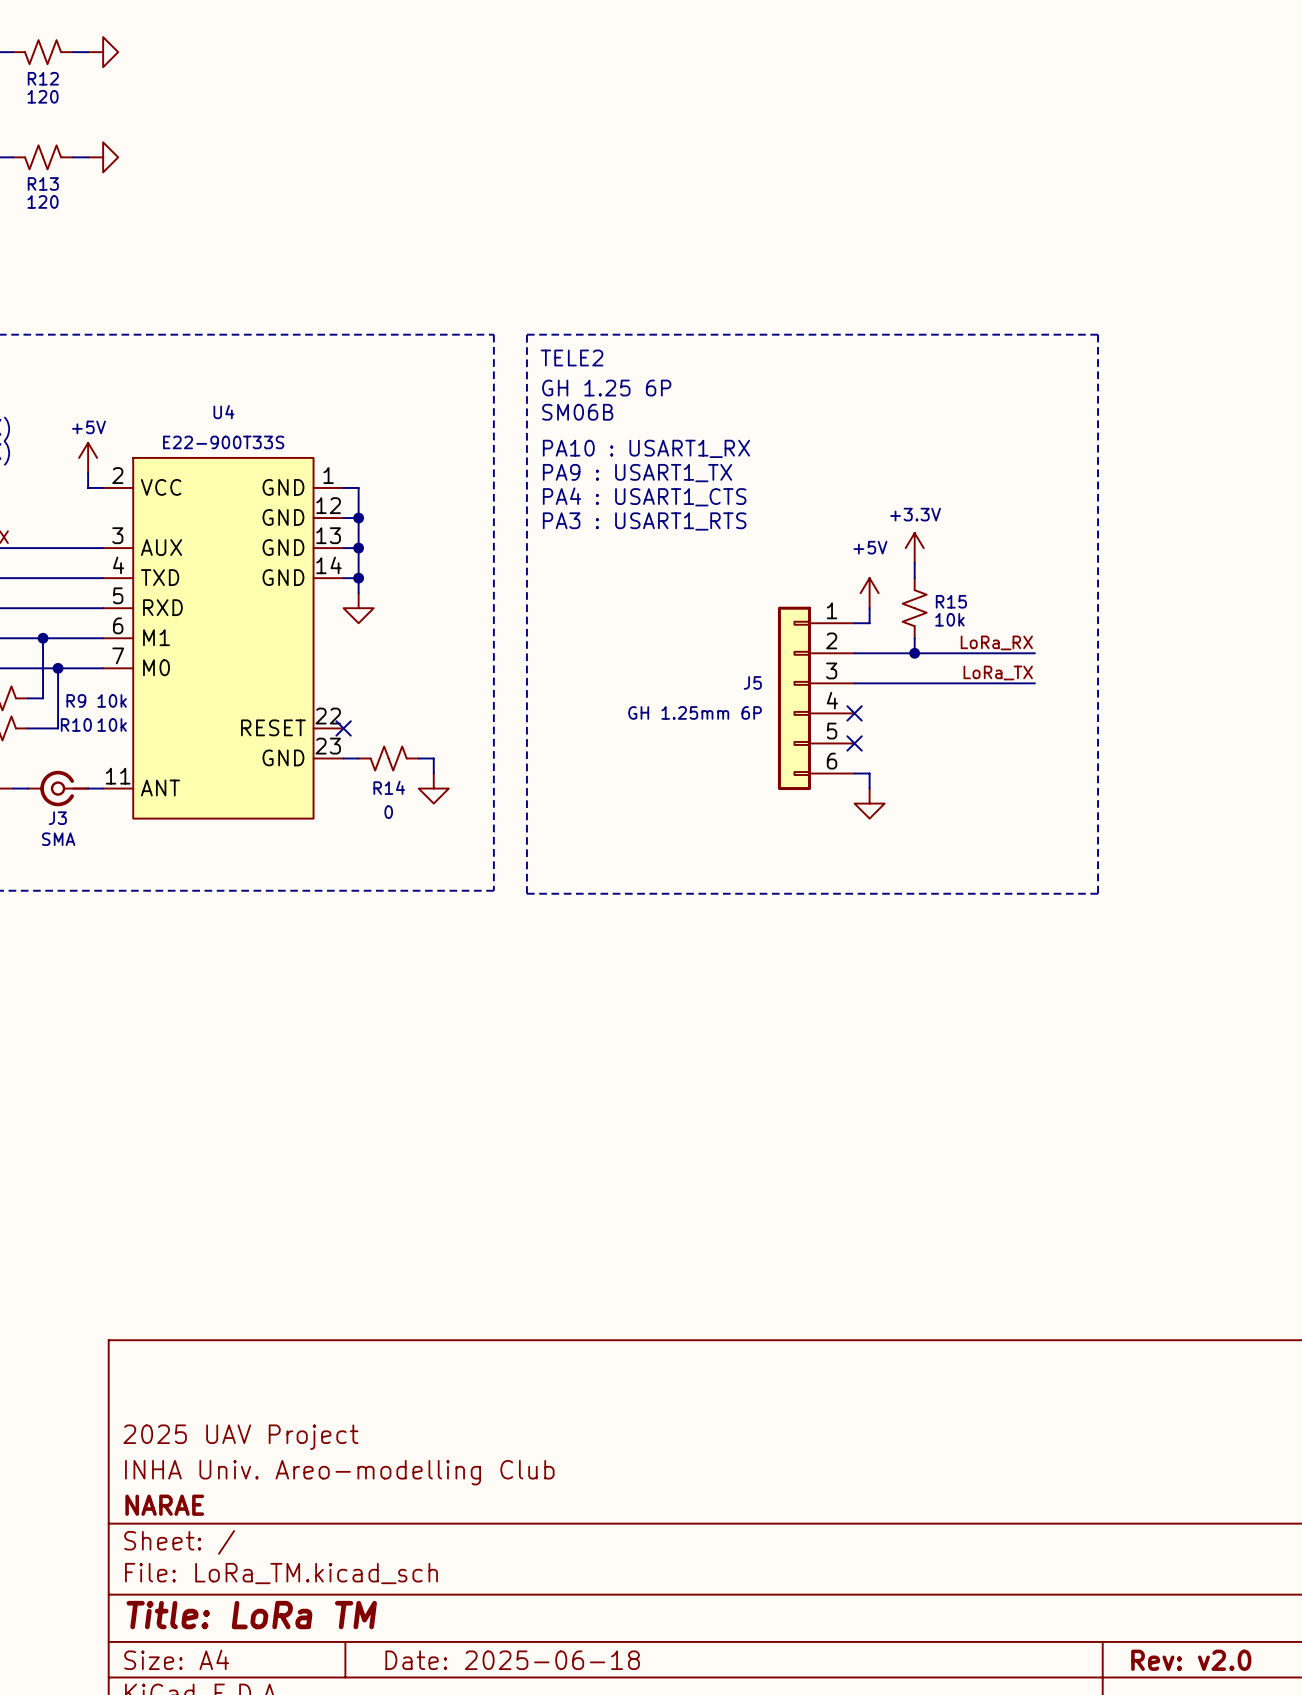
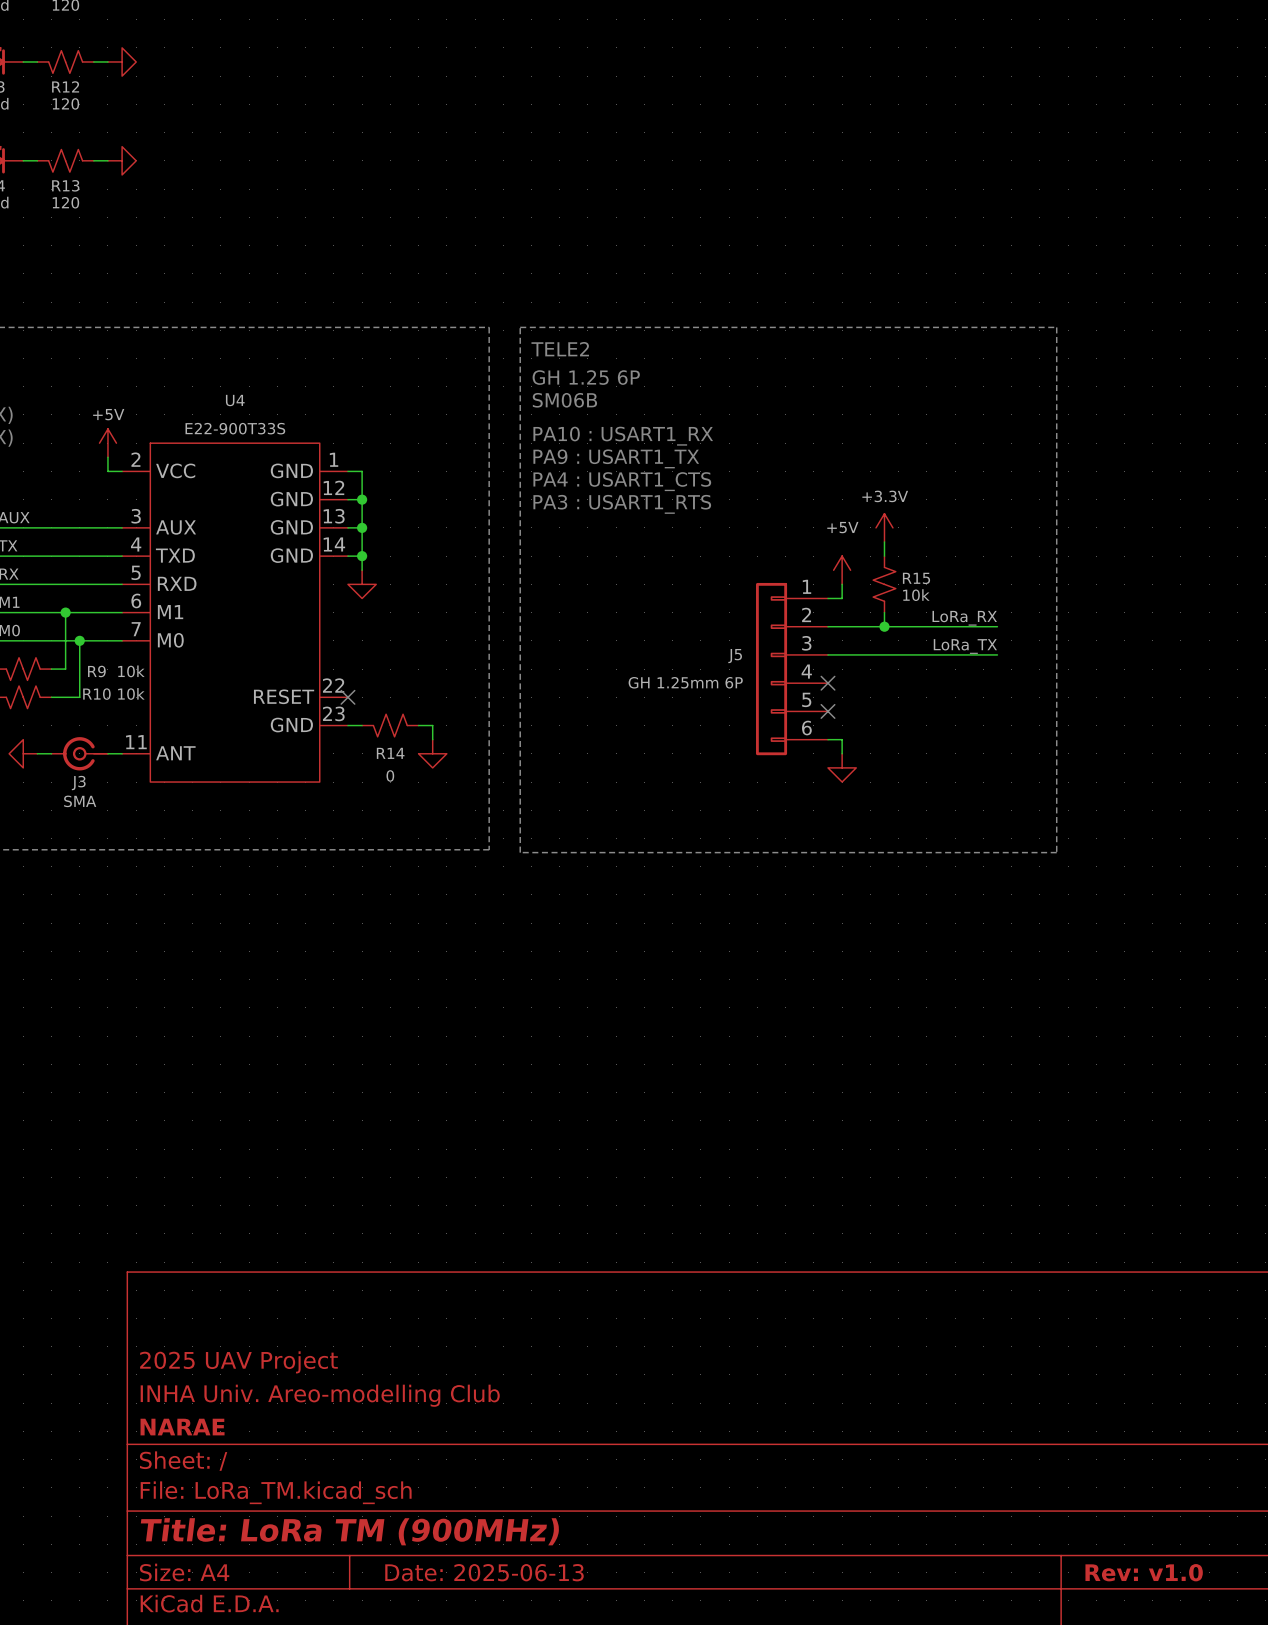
title block: Title: LoRa TM (251, 1615) -> Title: LoRa TM (900MHz) (350, 1531)
title block: Date: 2025-06-18 (512, 1660) -> Date: 2025-06-13 (484, 1572)
title block: Rev: v2.0 (1191, 1660) -> Rev: v1.0 (1144, 1572)

